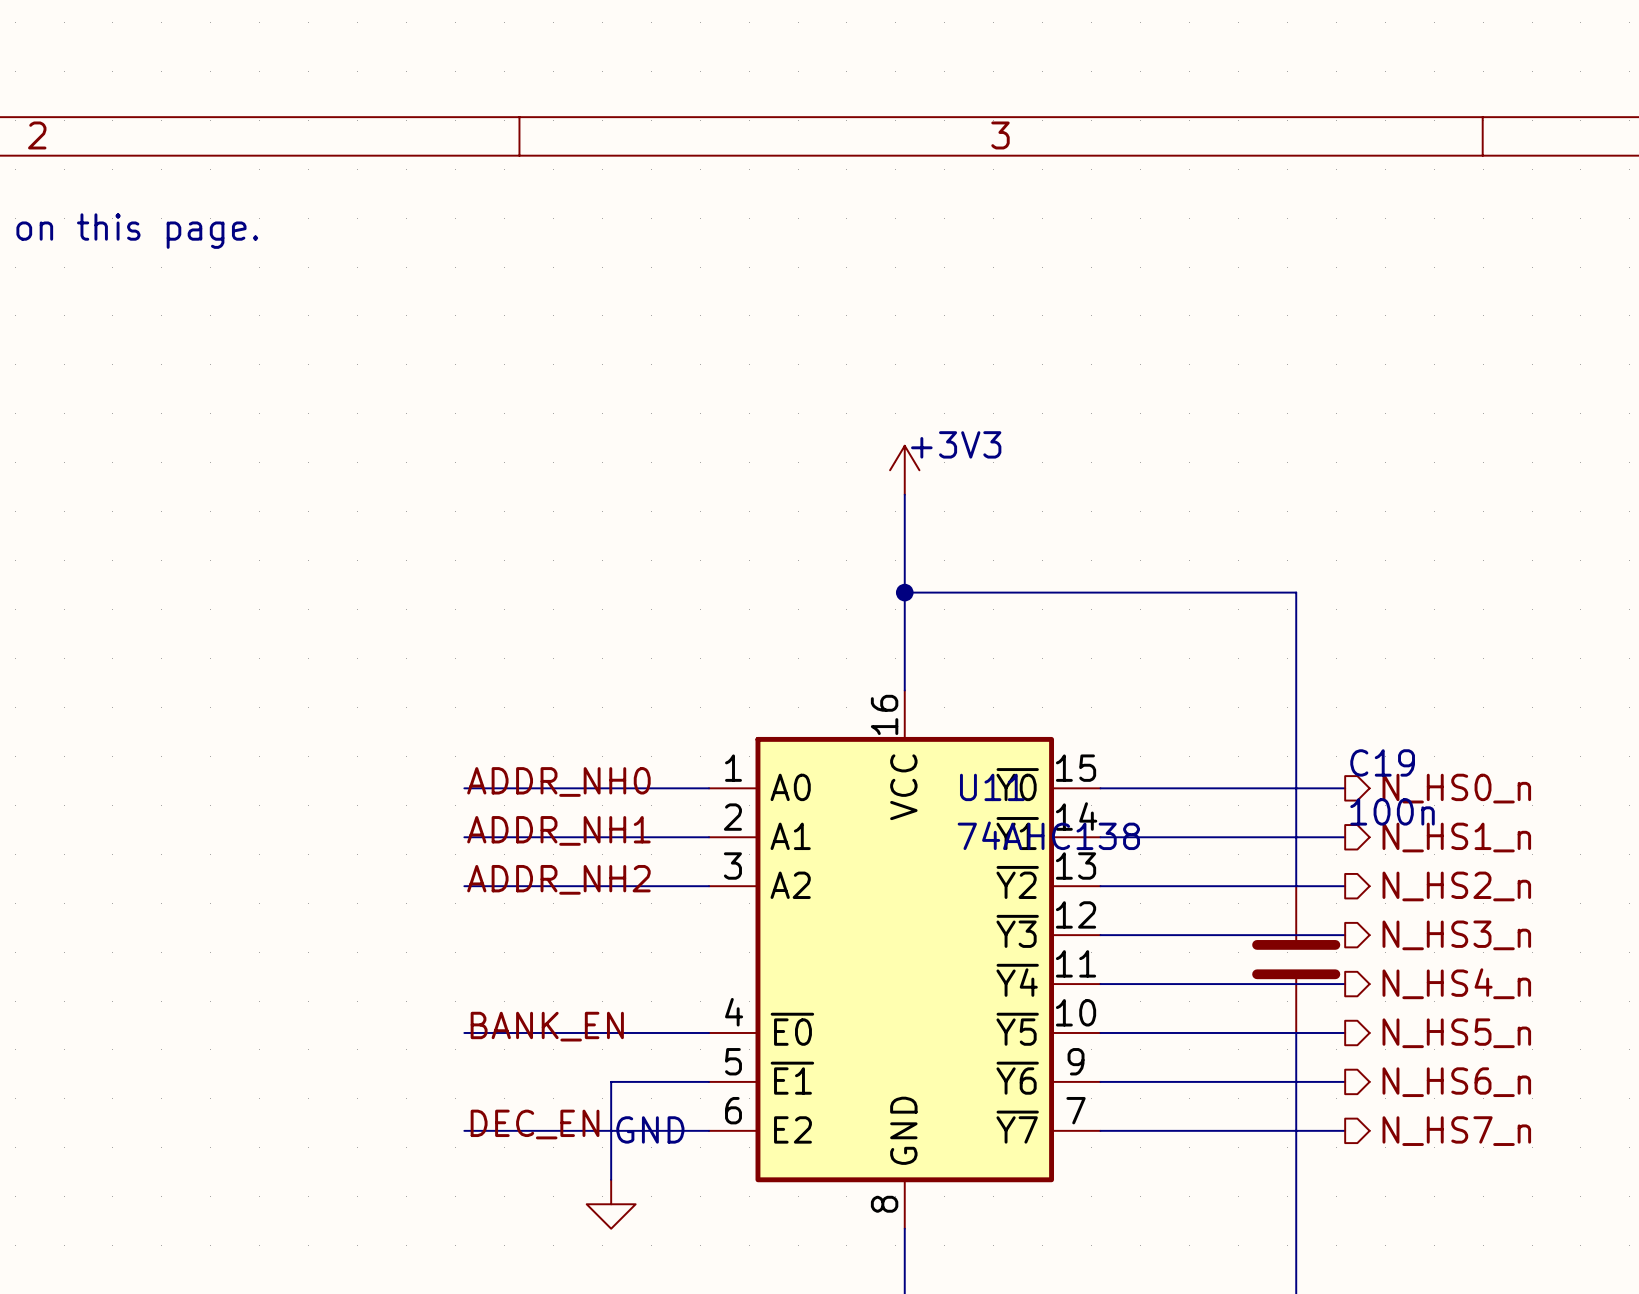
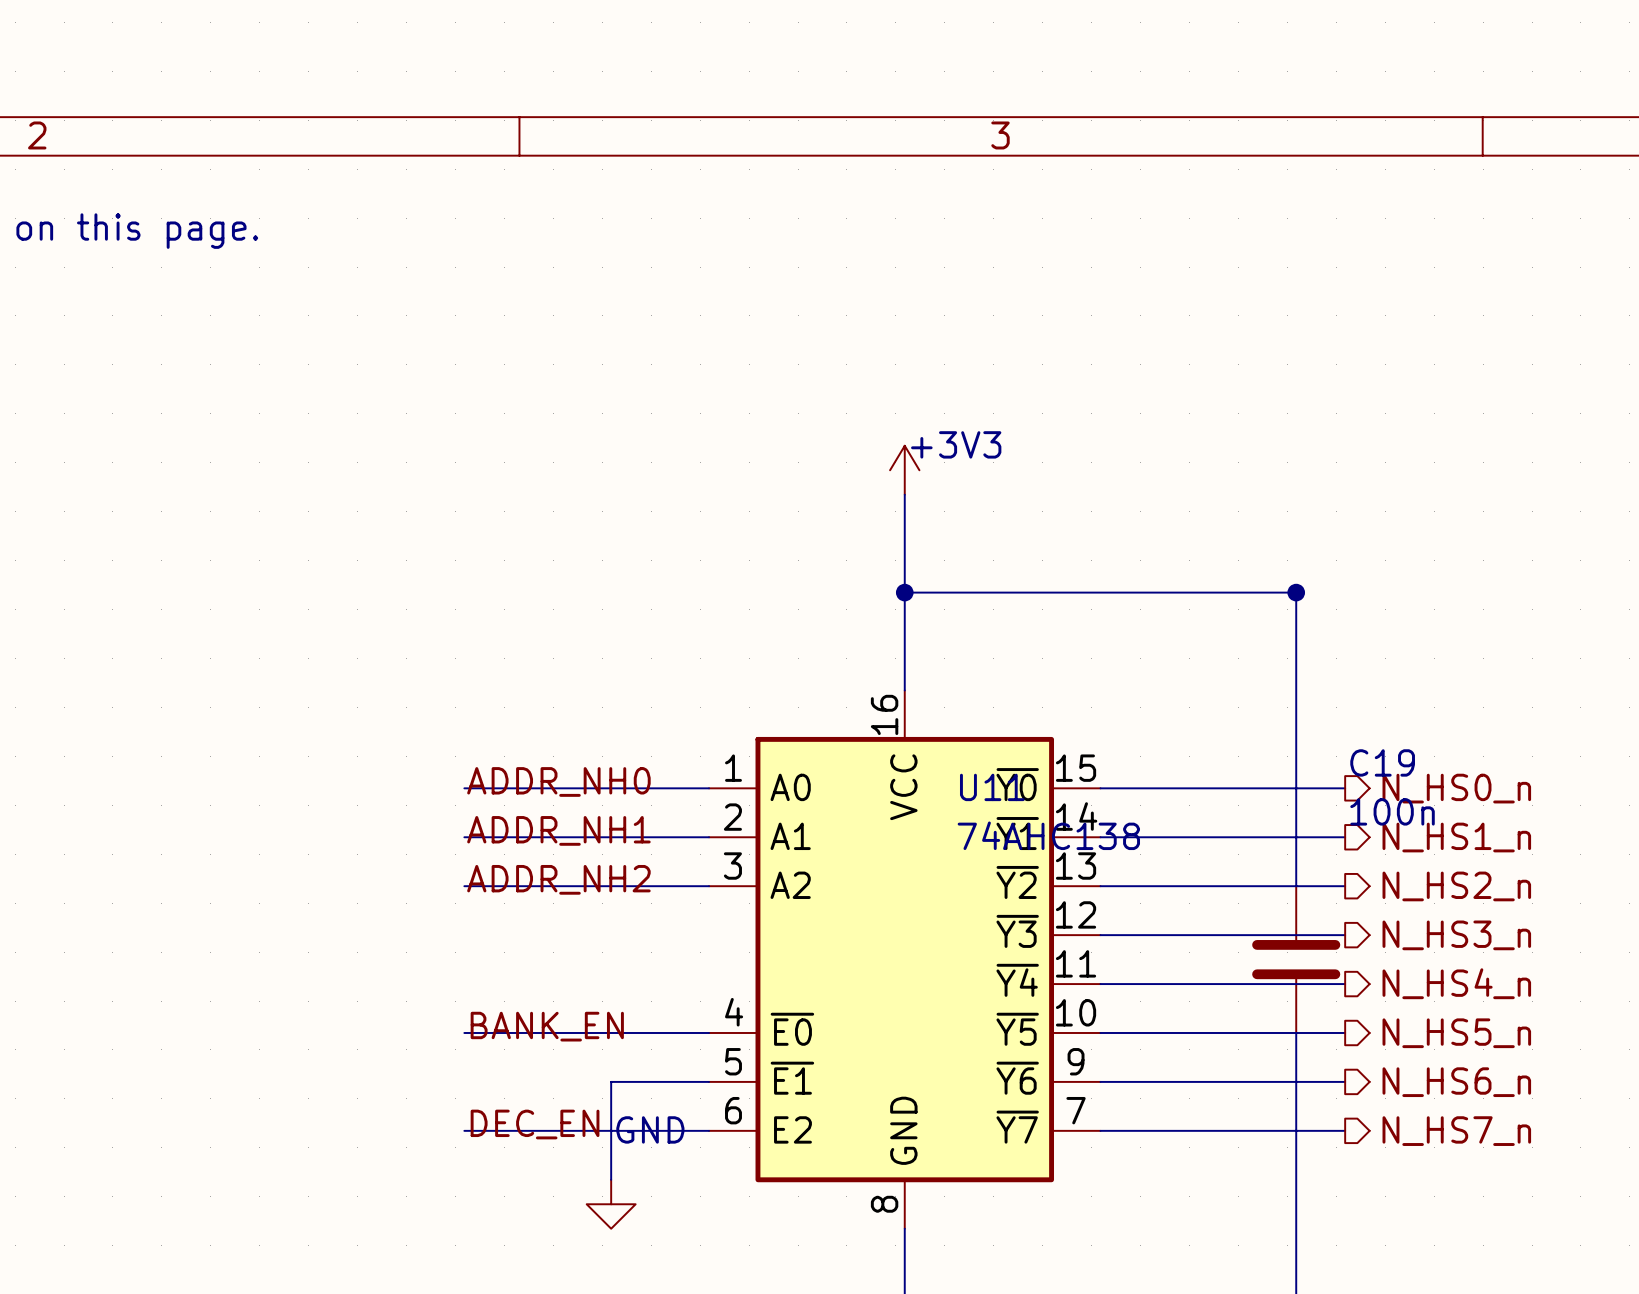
junction: none -> (1296, 592)

